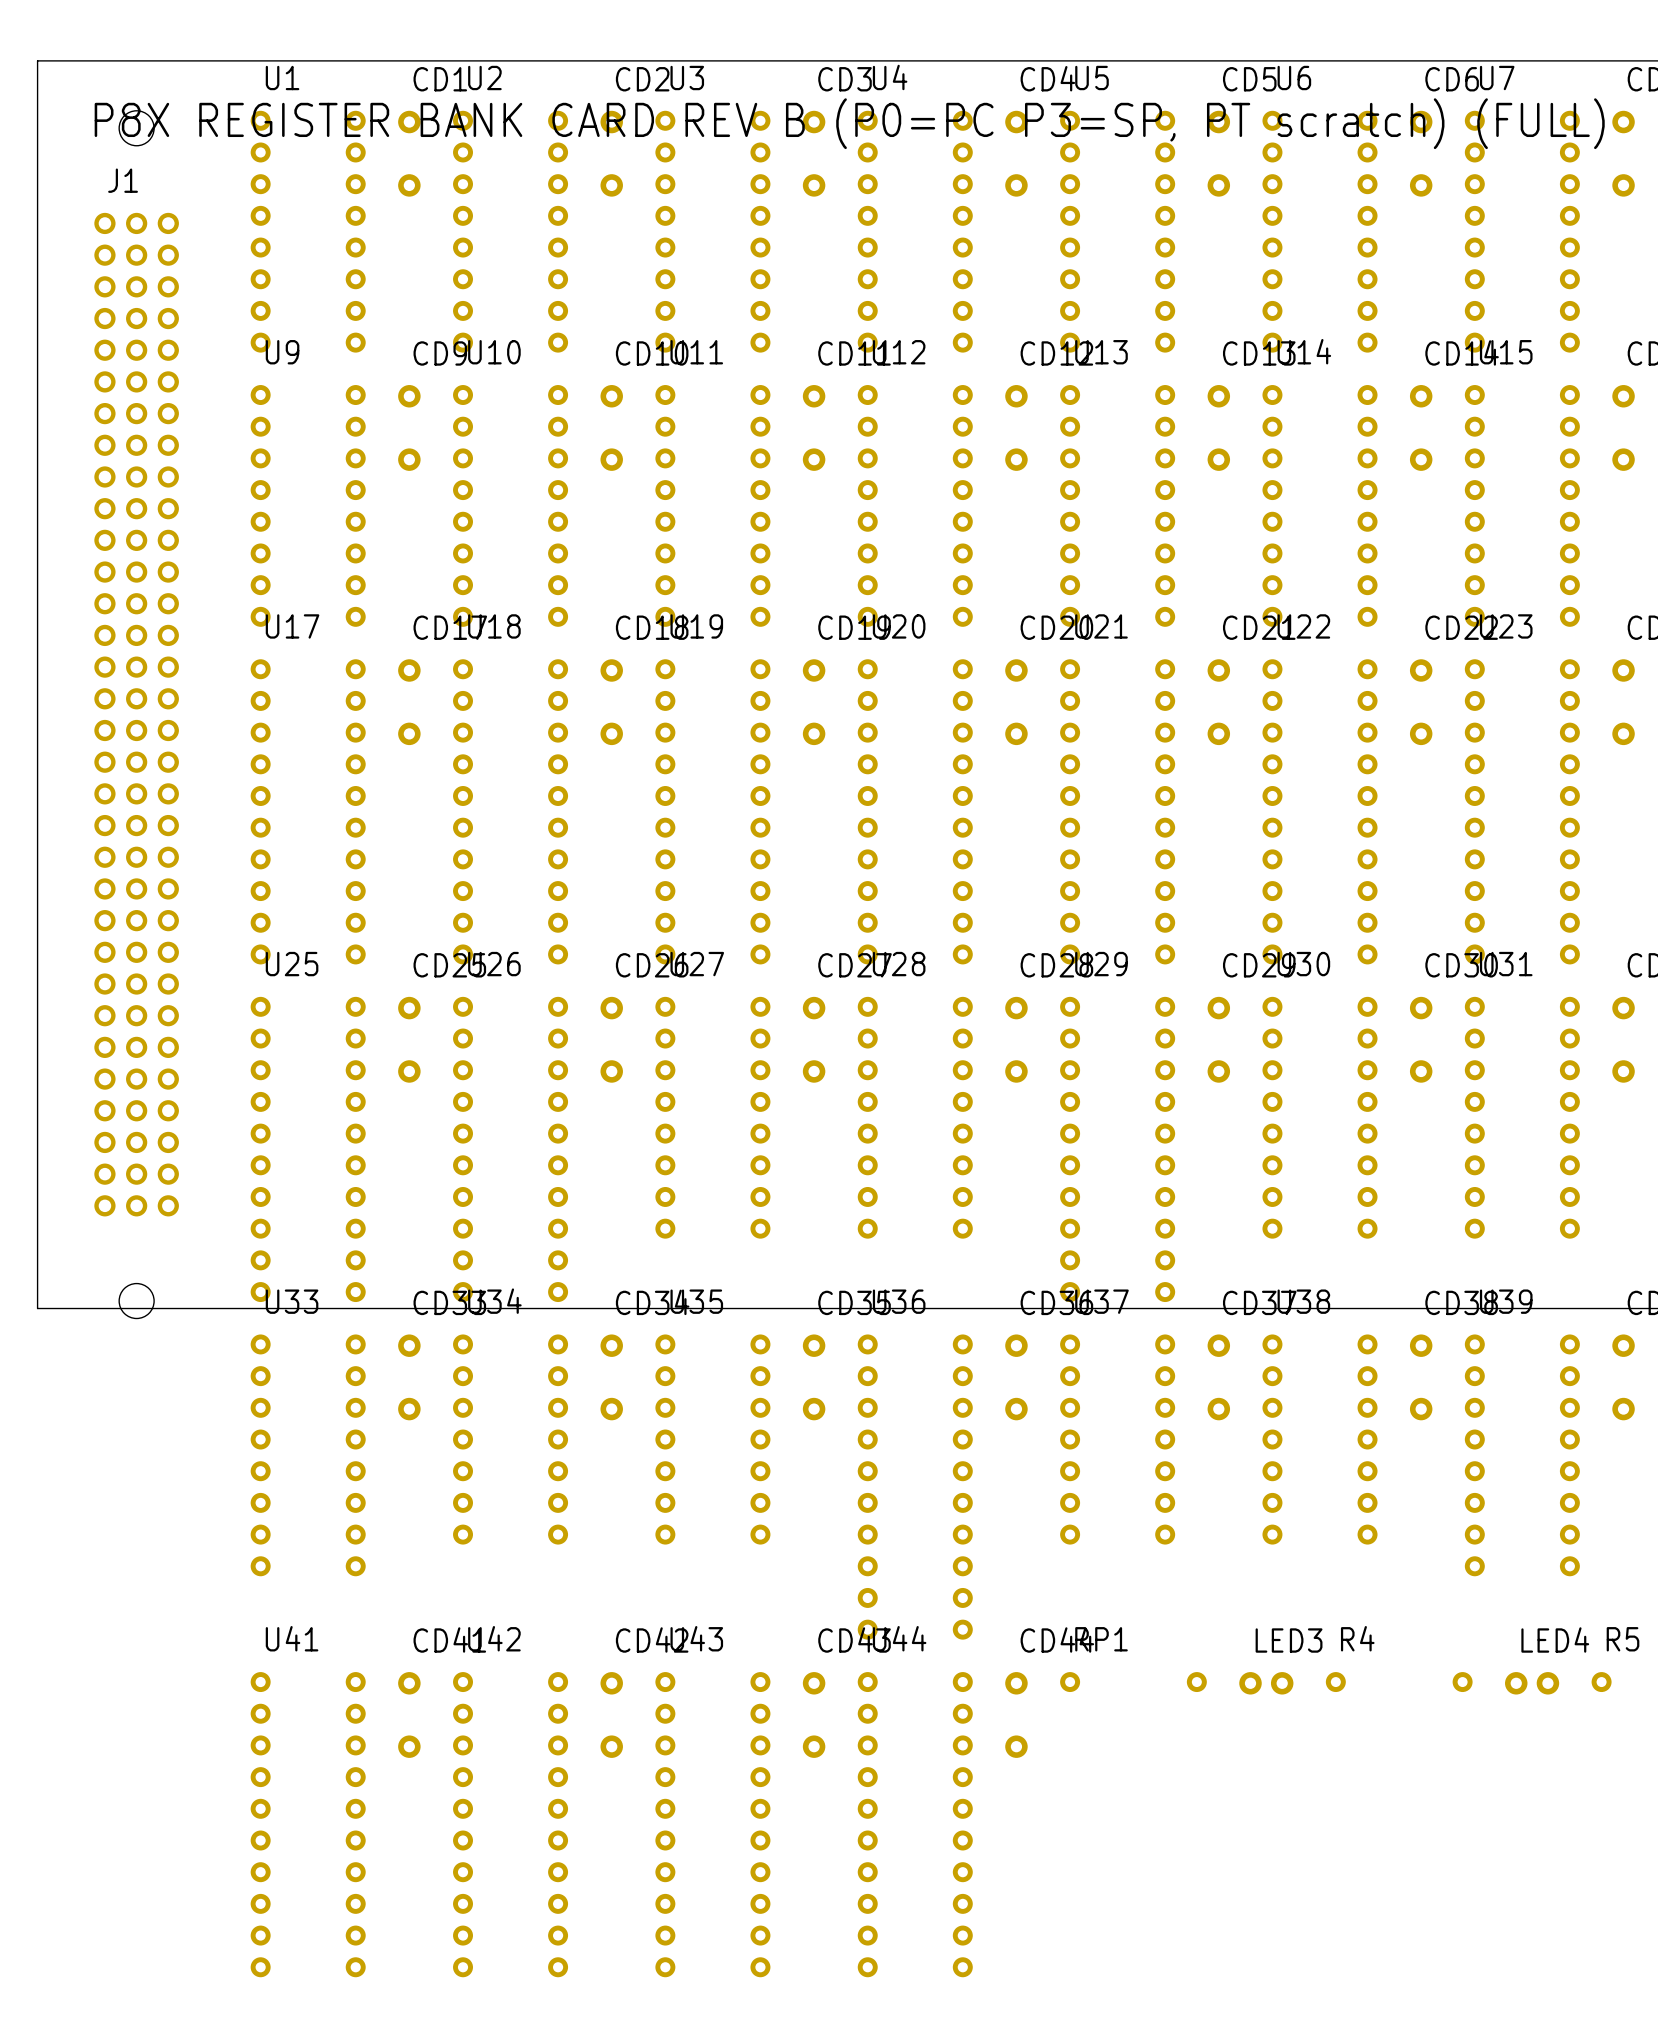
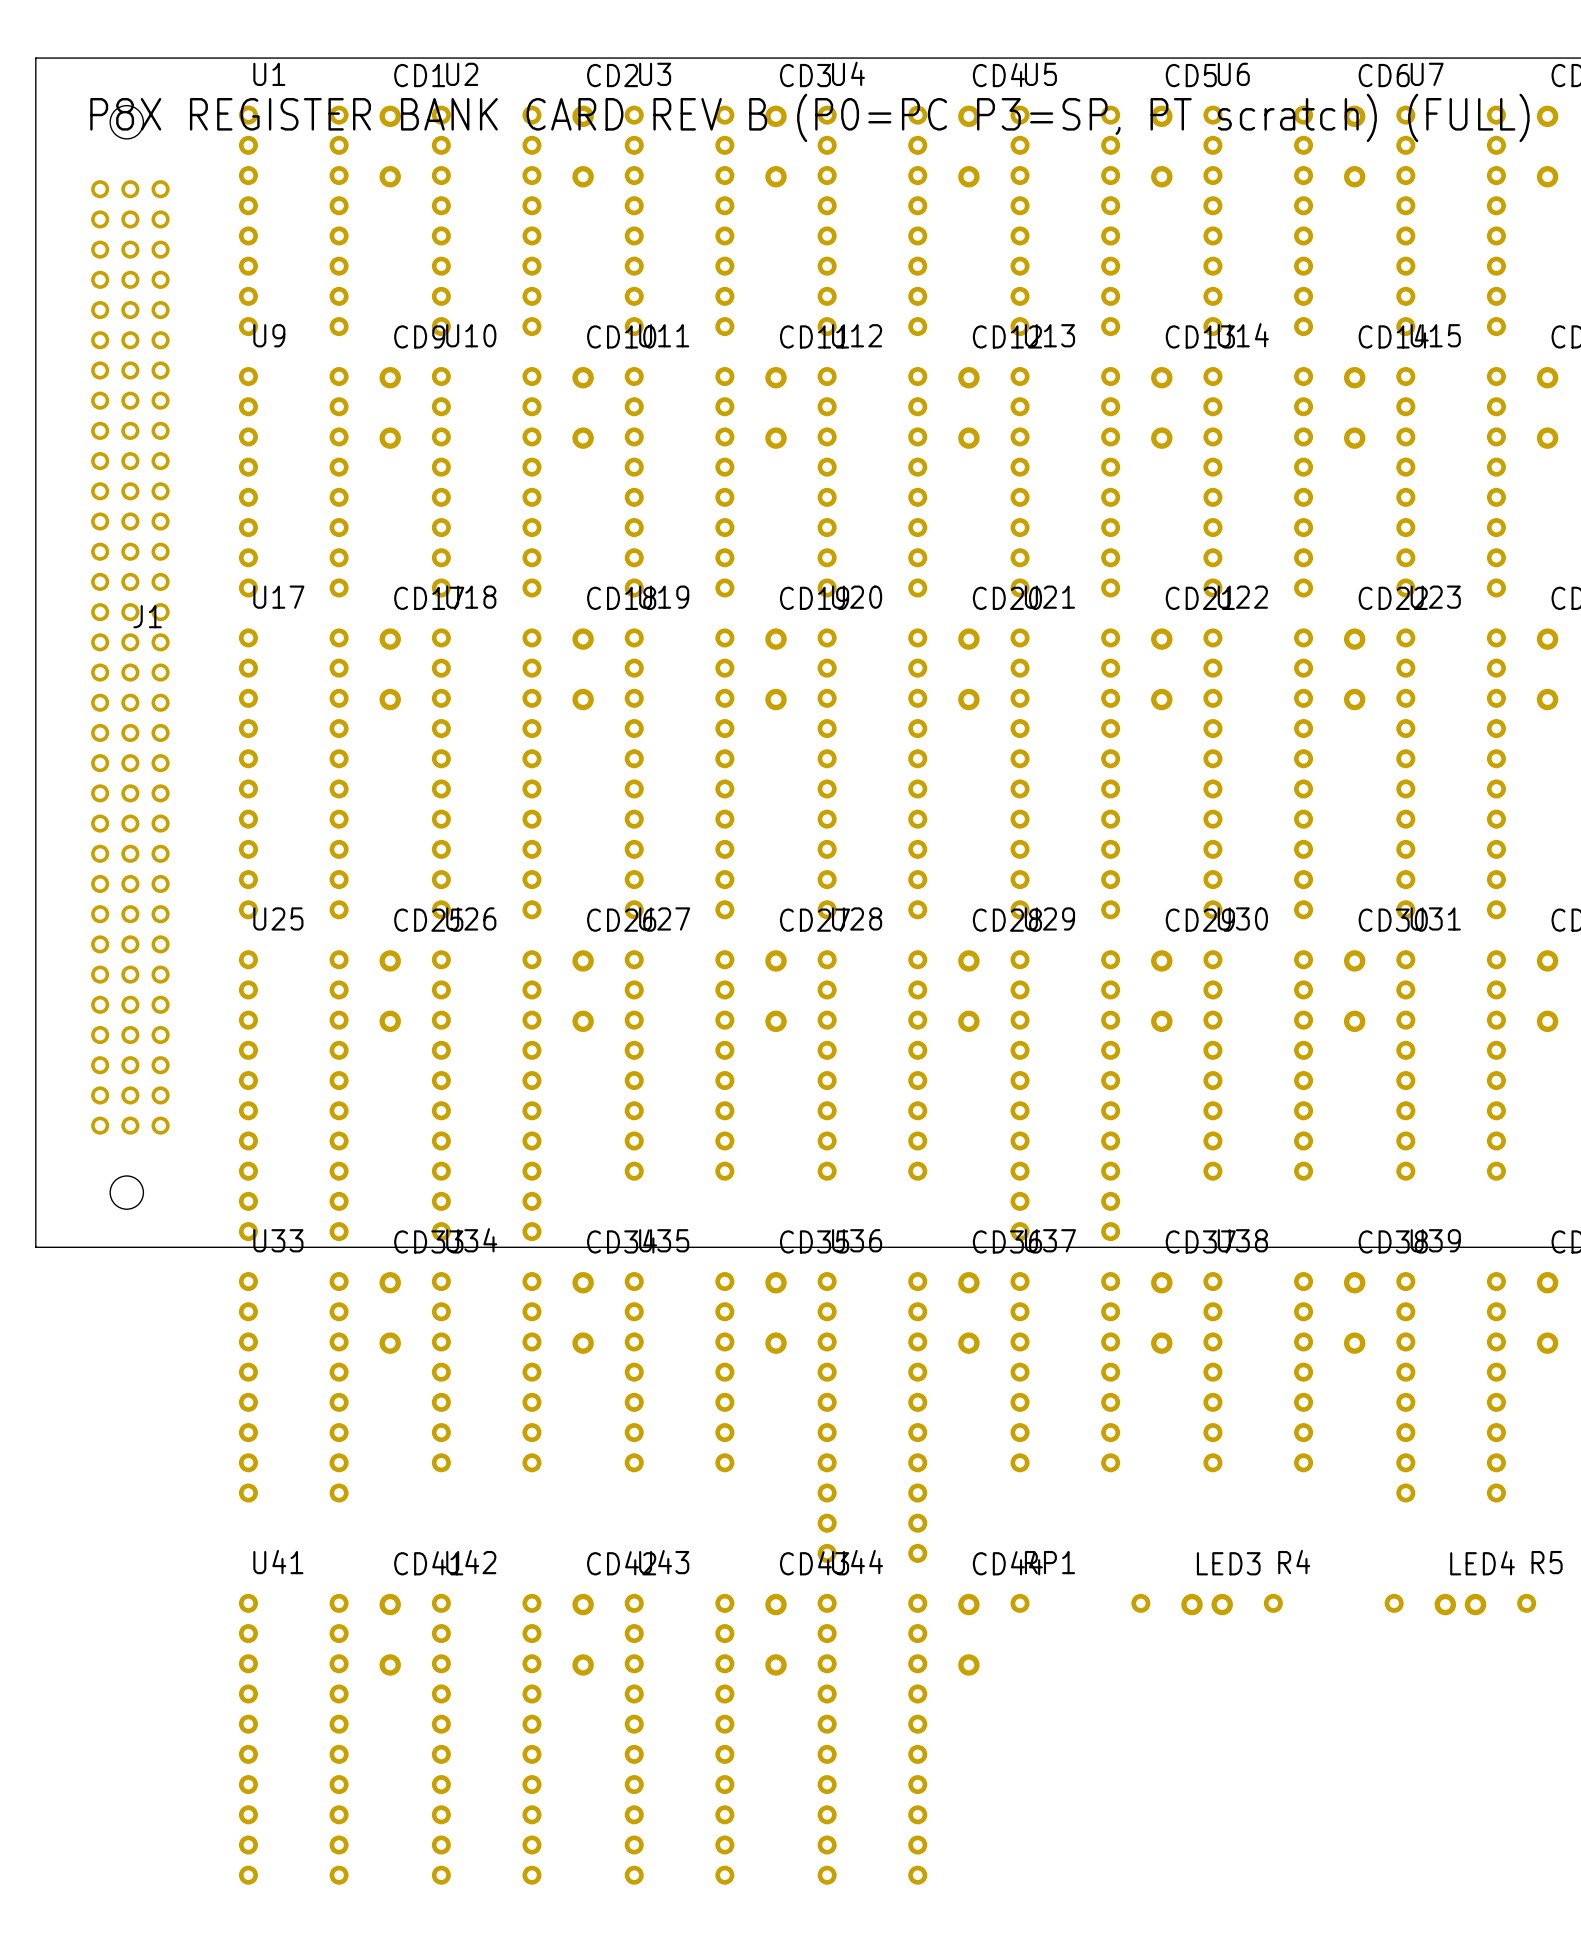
J1 footprint: [94, 110, 179, 1319] -> [91, 105, 170, 1210]
J1 name position: J1 (123, 180) -> J1 (147, 616)

